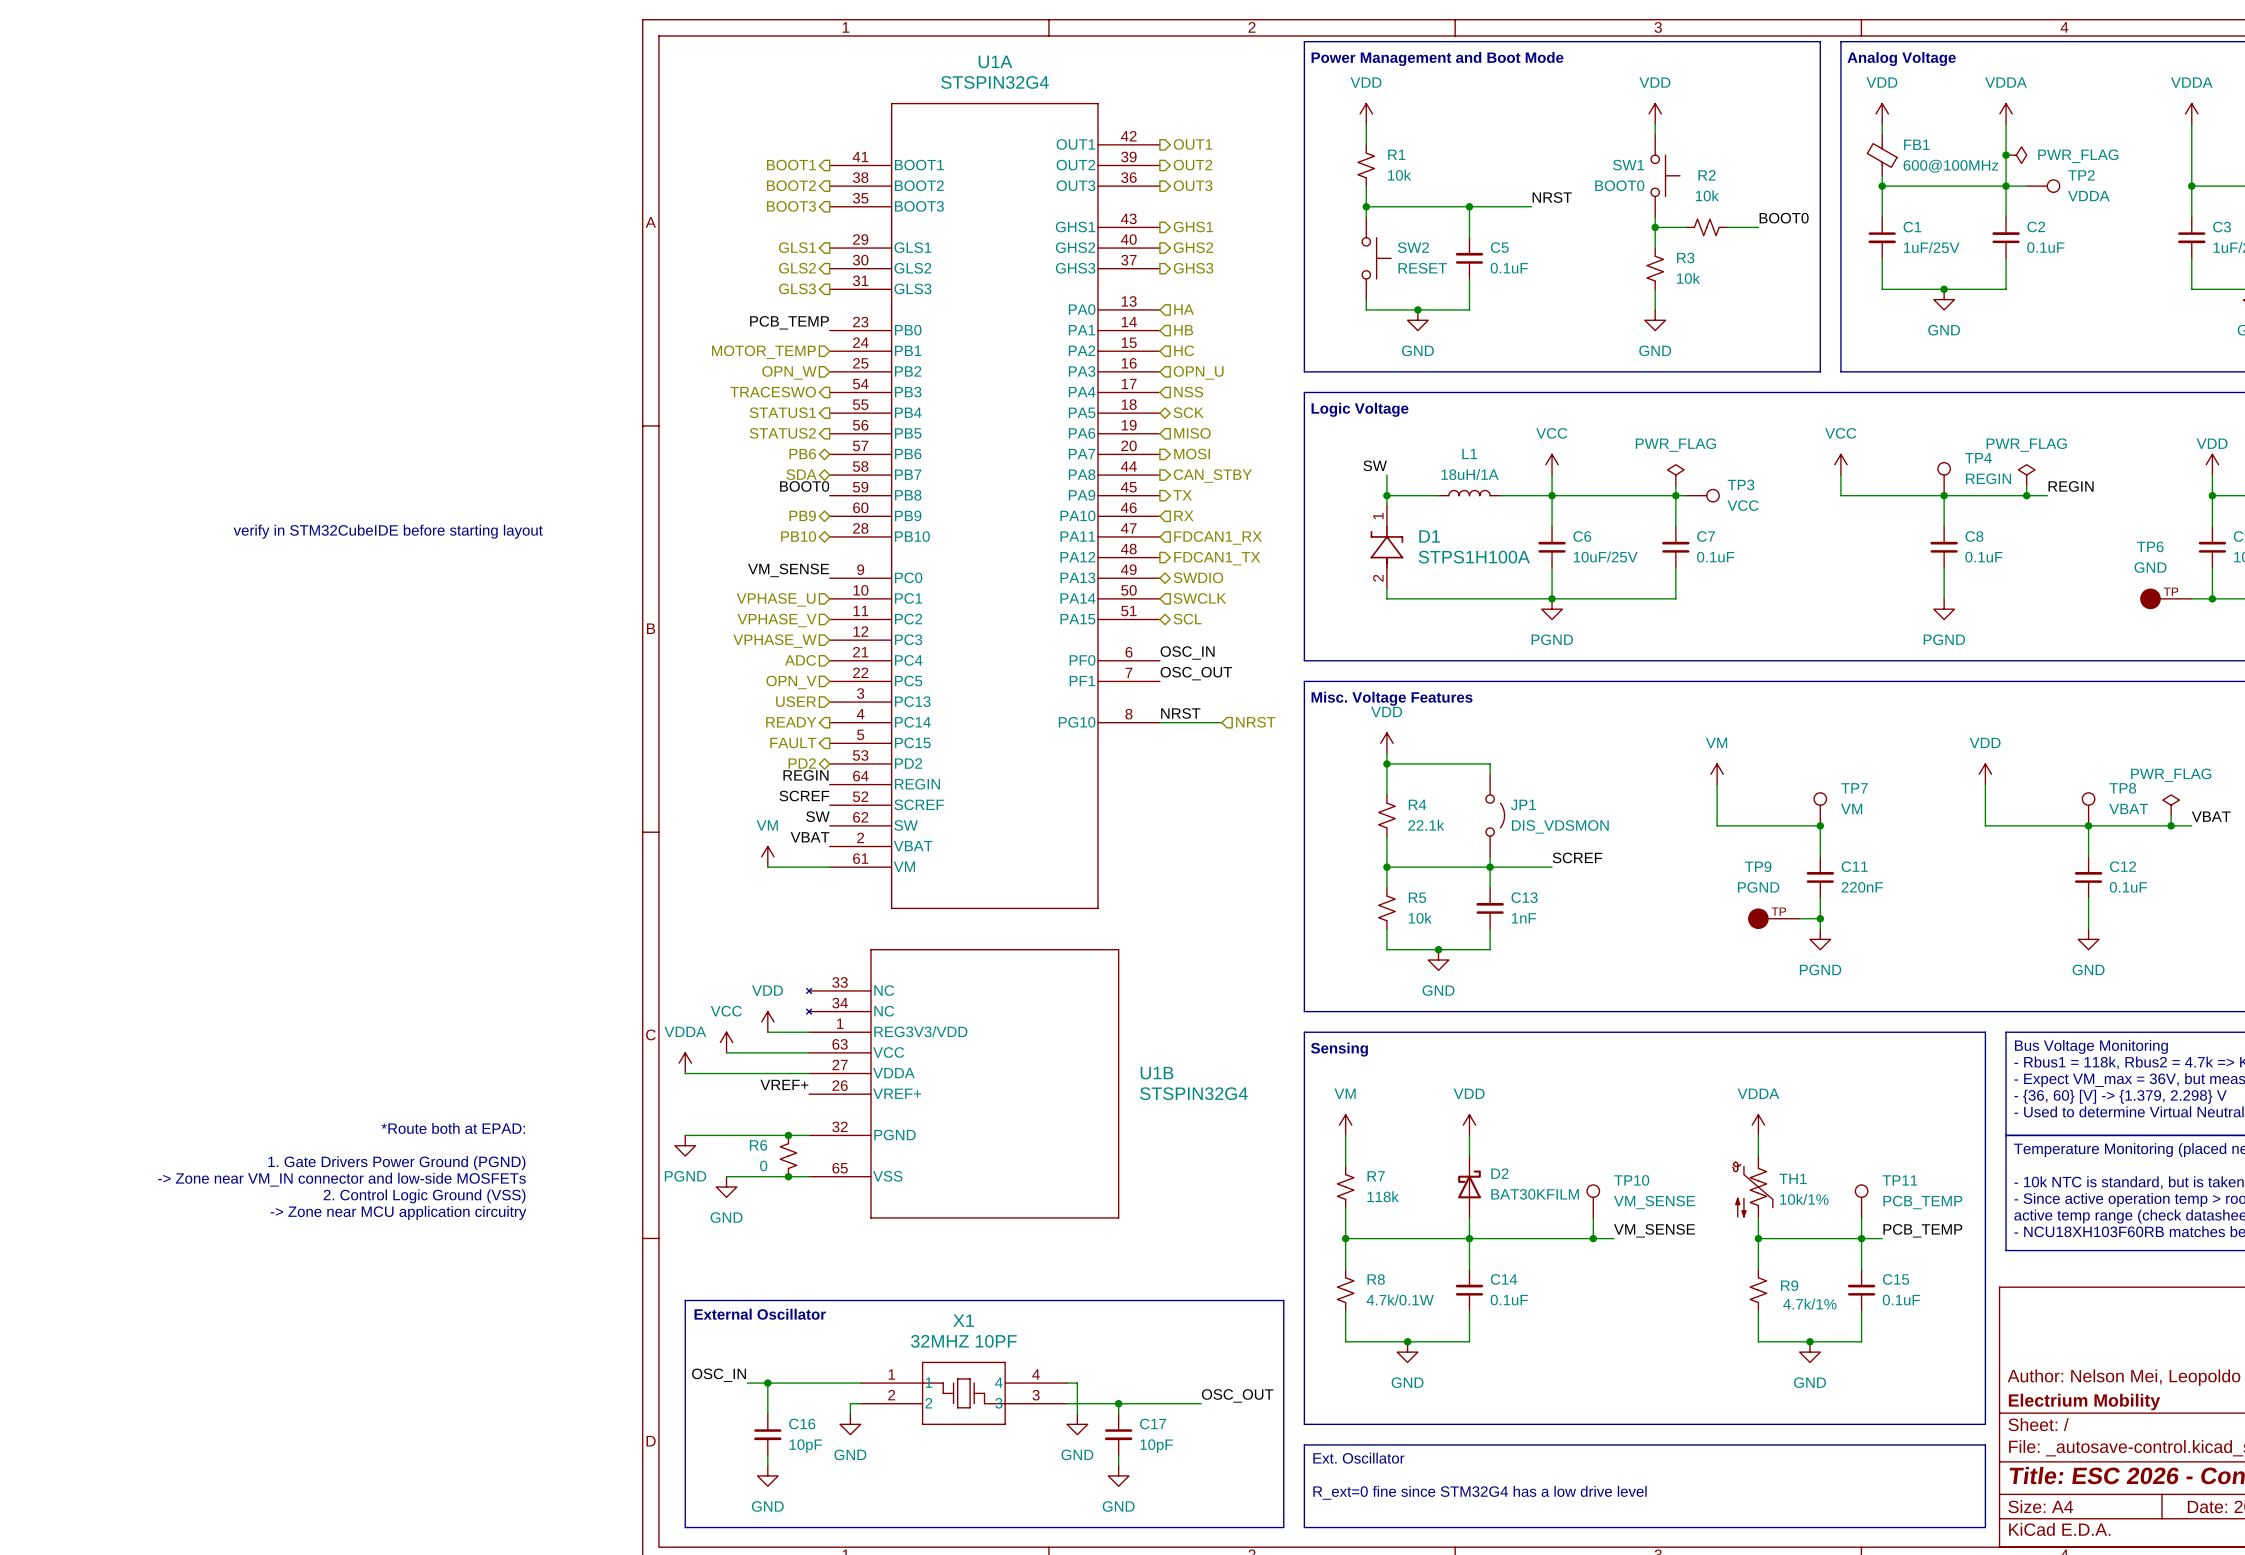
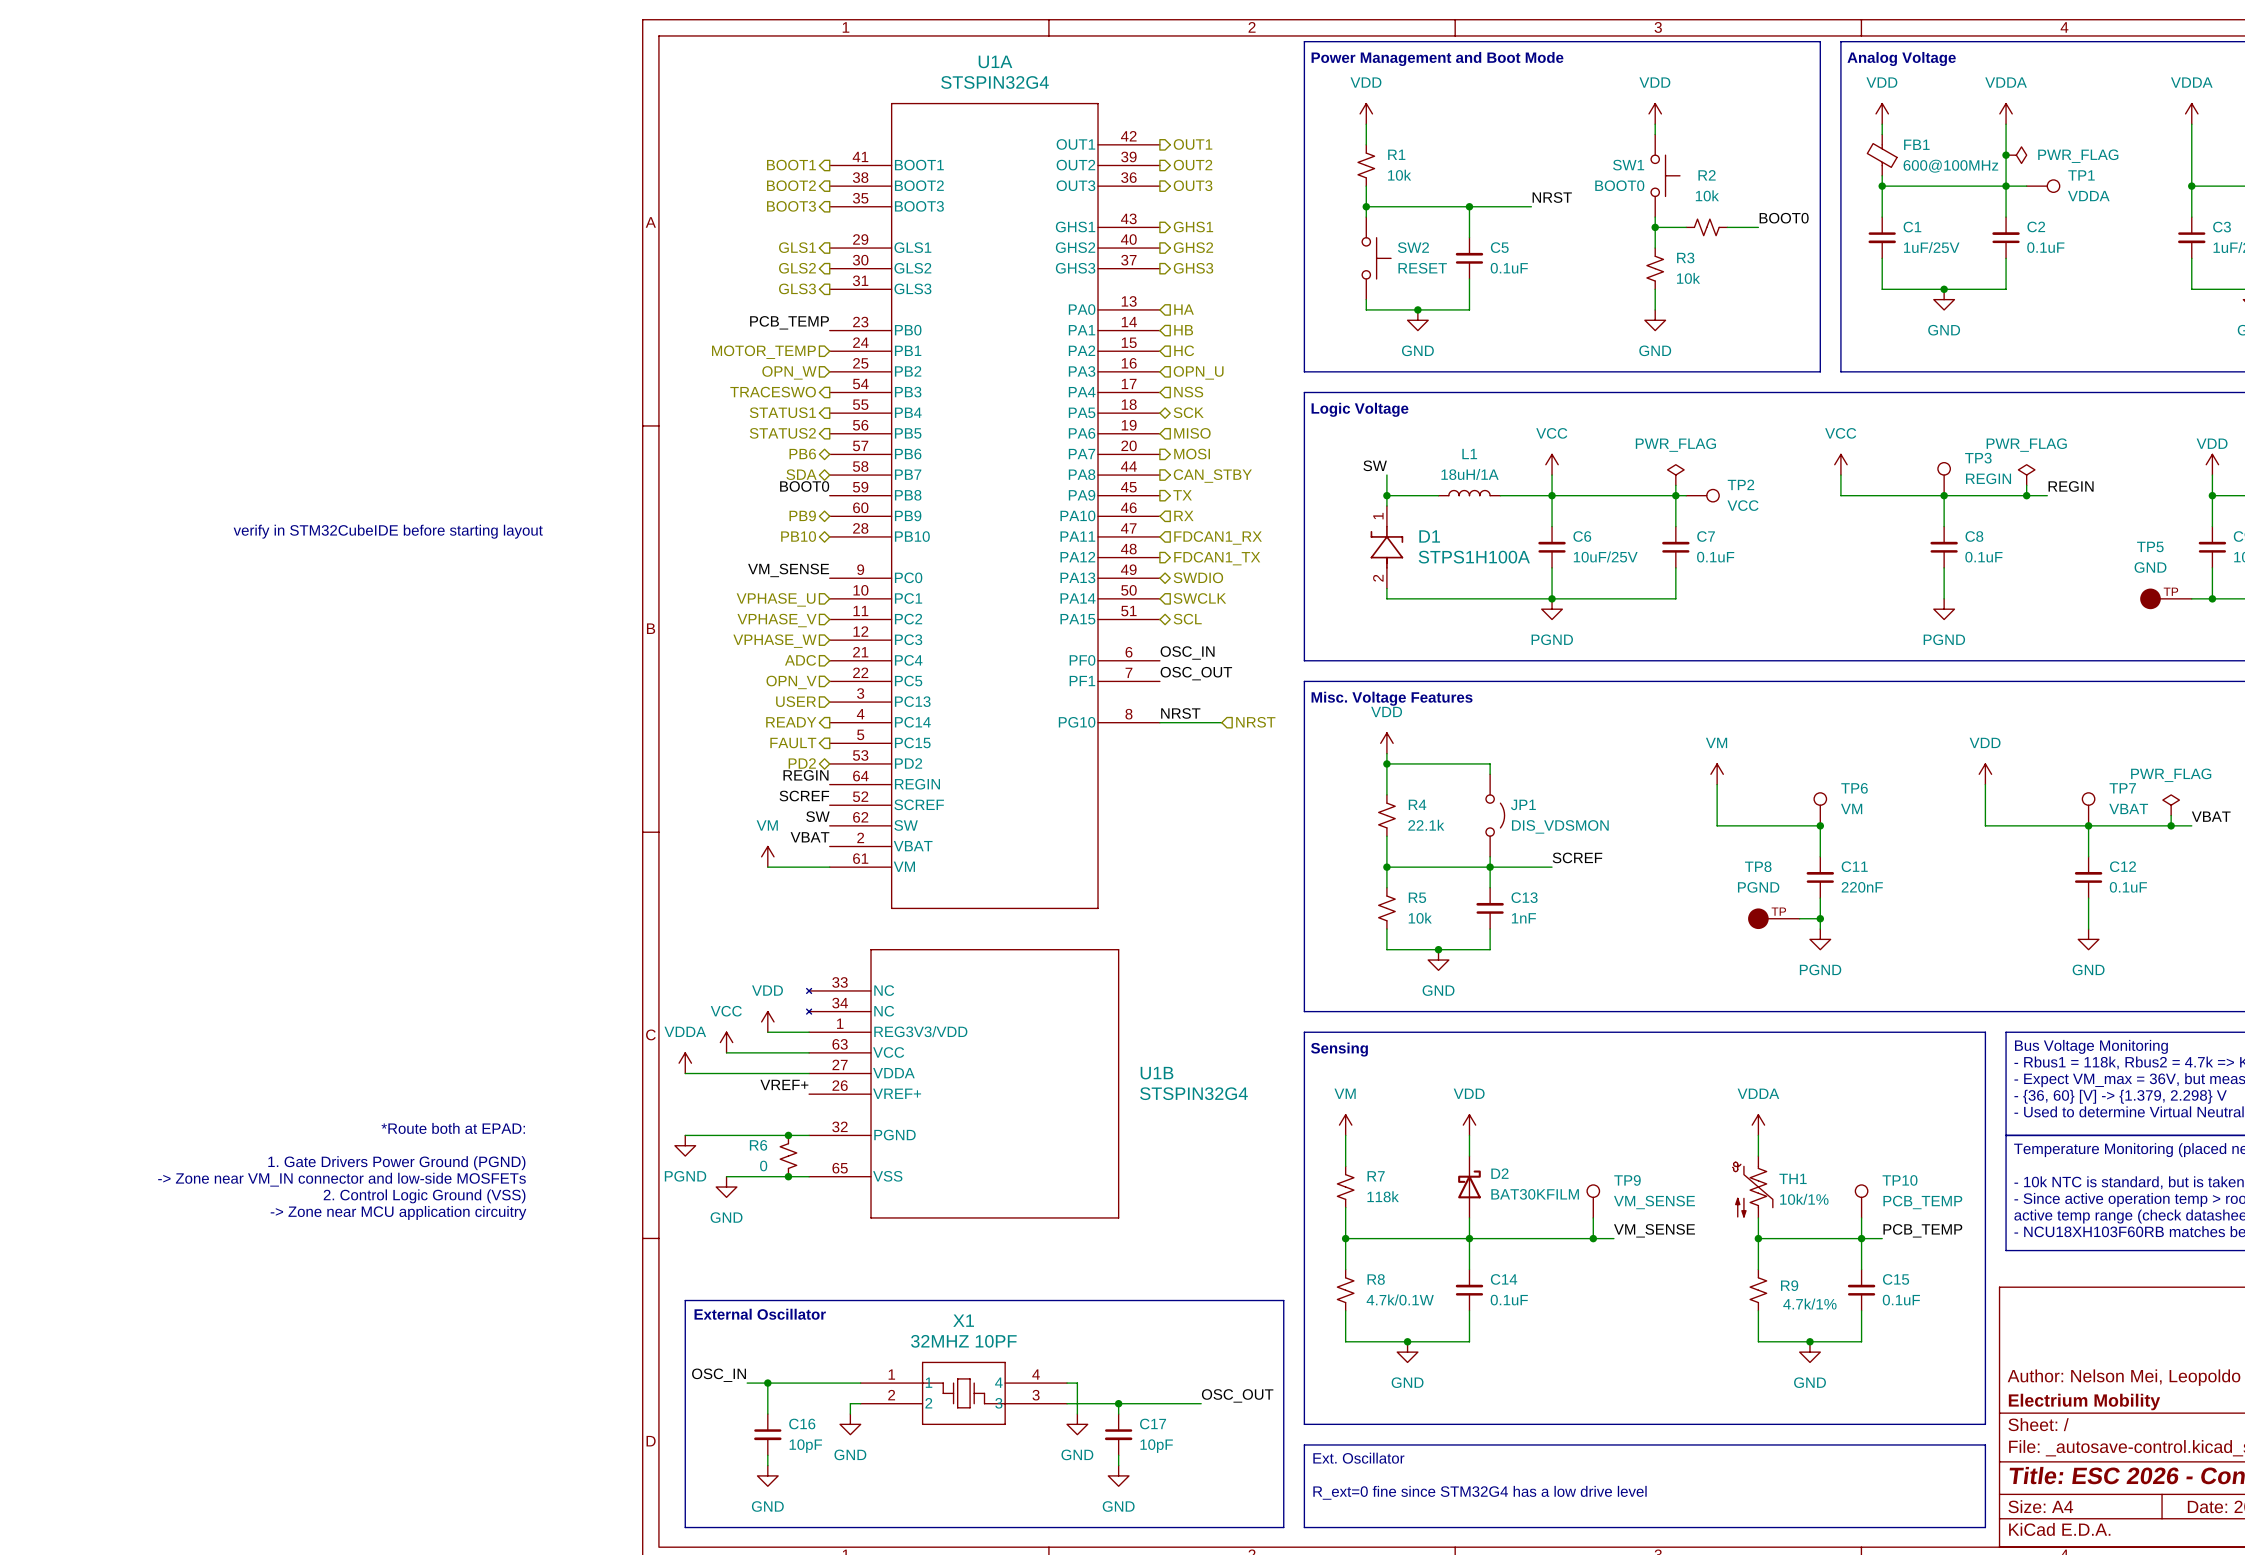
TP2 name: TP2 (2081, 175) -> TP1 (2081, 175)
TP4 name: TP4 (1978, 458) -> TP3 (1978, 458)
TP3 name: TP3 (1741, 484) -> TP2 (1740, 484)
TP6 name: TP6 (2150, 546) -> TP5 (2150, 546)
TP7 name: TP7 (1854, 788) -> TP6 (1854, 788)
TP8 name: TP8 (2122, 788) -> TP7 (2122, 788)
TP9 name: TP9 (1758, 866) -> TP8 (1758, 866)
TP10 name: TP10 (1631, 1180) -> TP9 (1627, 1180)
TP11 name: TP11 (1899, 1180) -> TP10 (1900, 1180)

